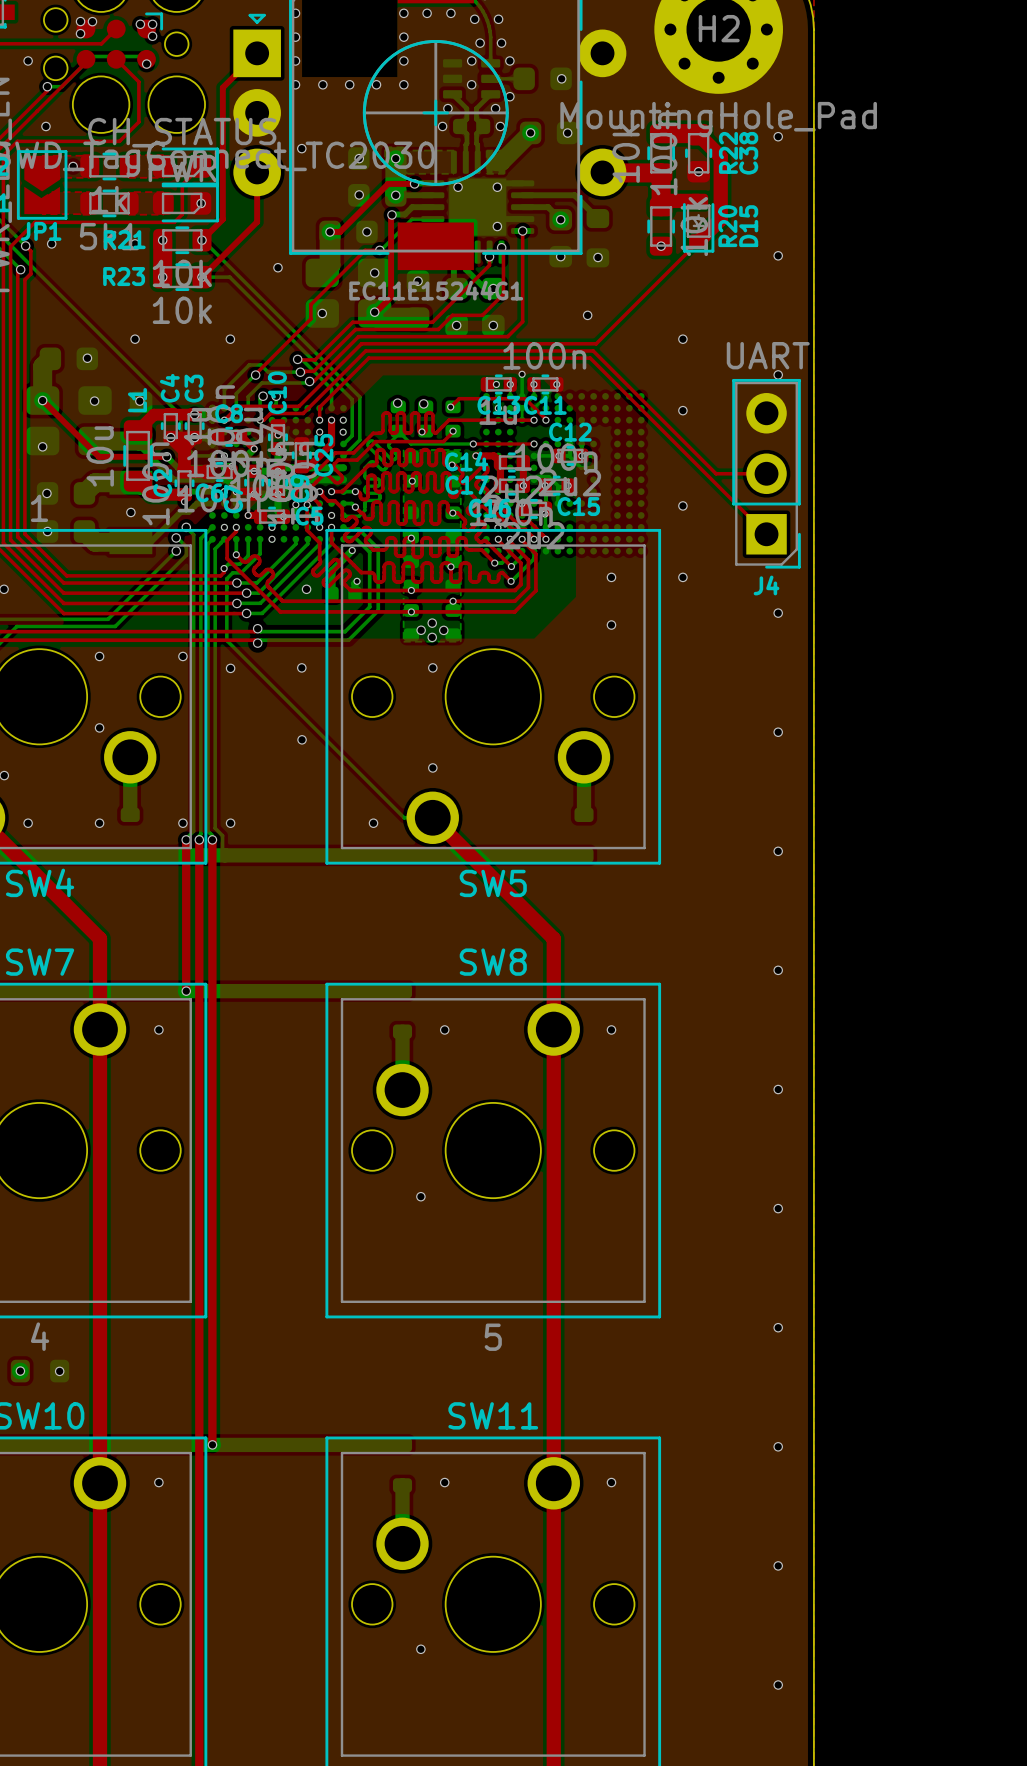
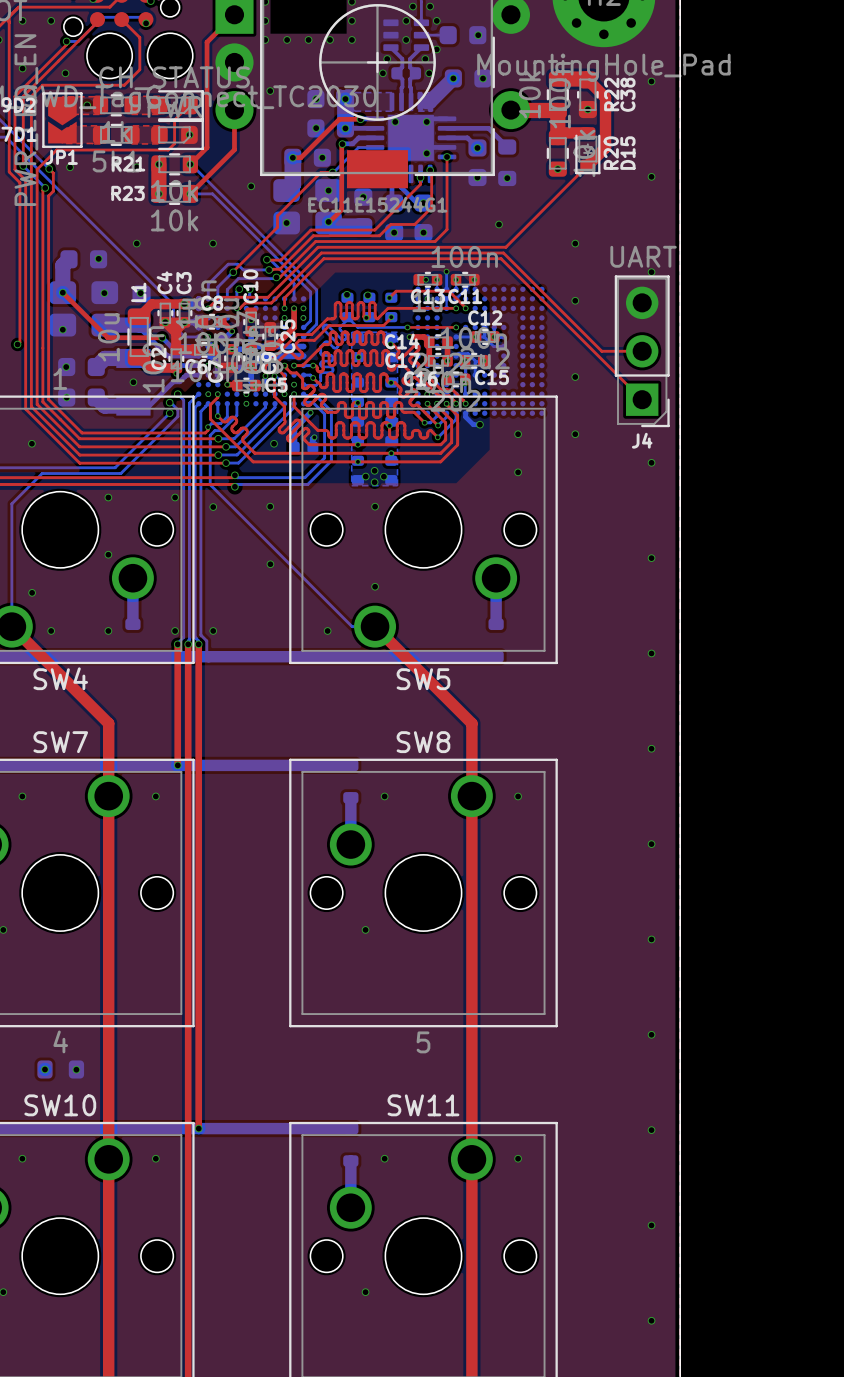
bottom track: none -> (465, 413) (465, 417) (473, 424) (479, 424)
via: none -> (479, 424)

